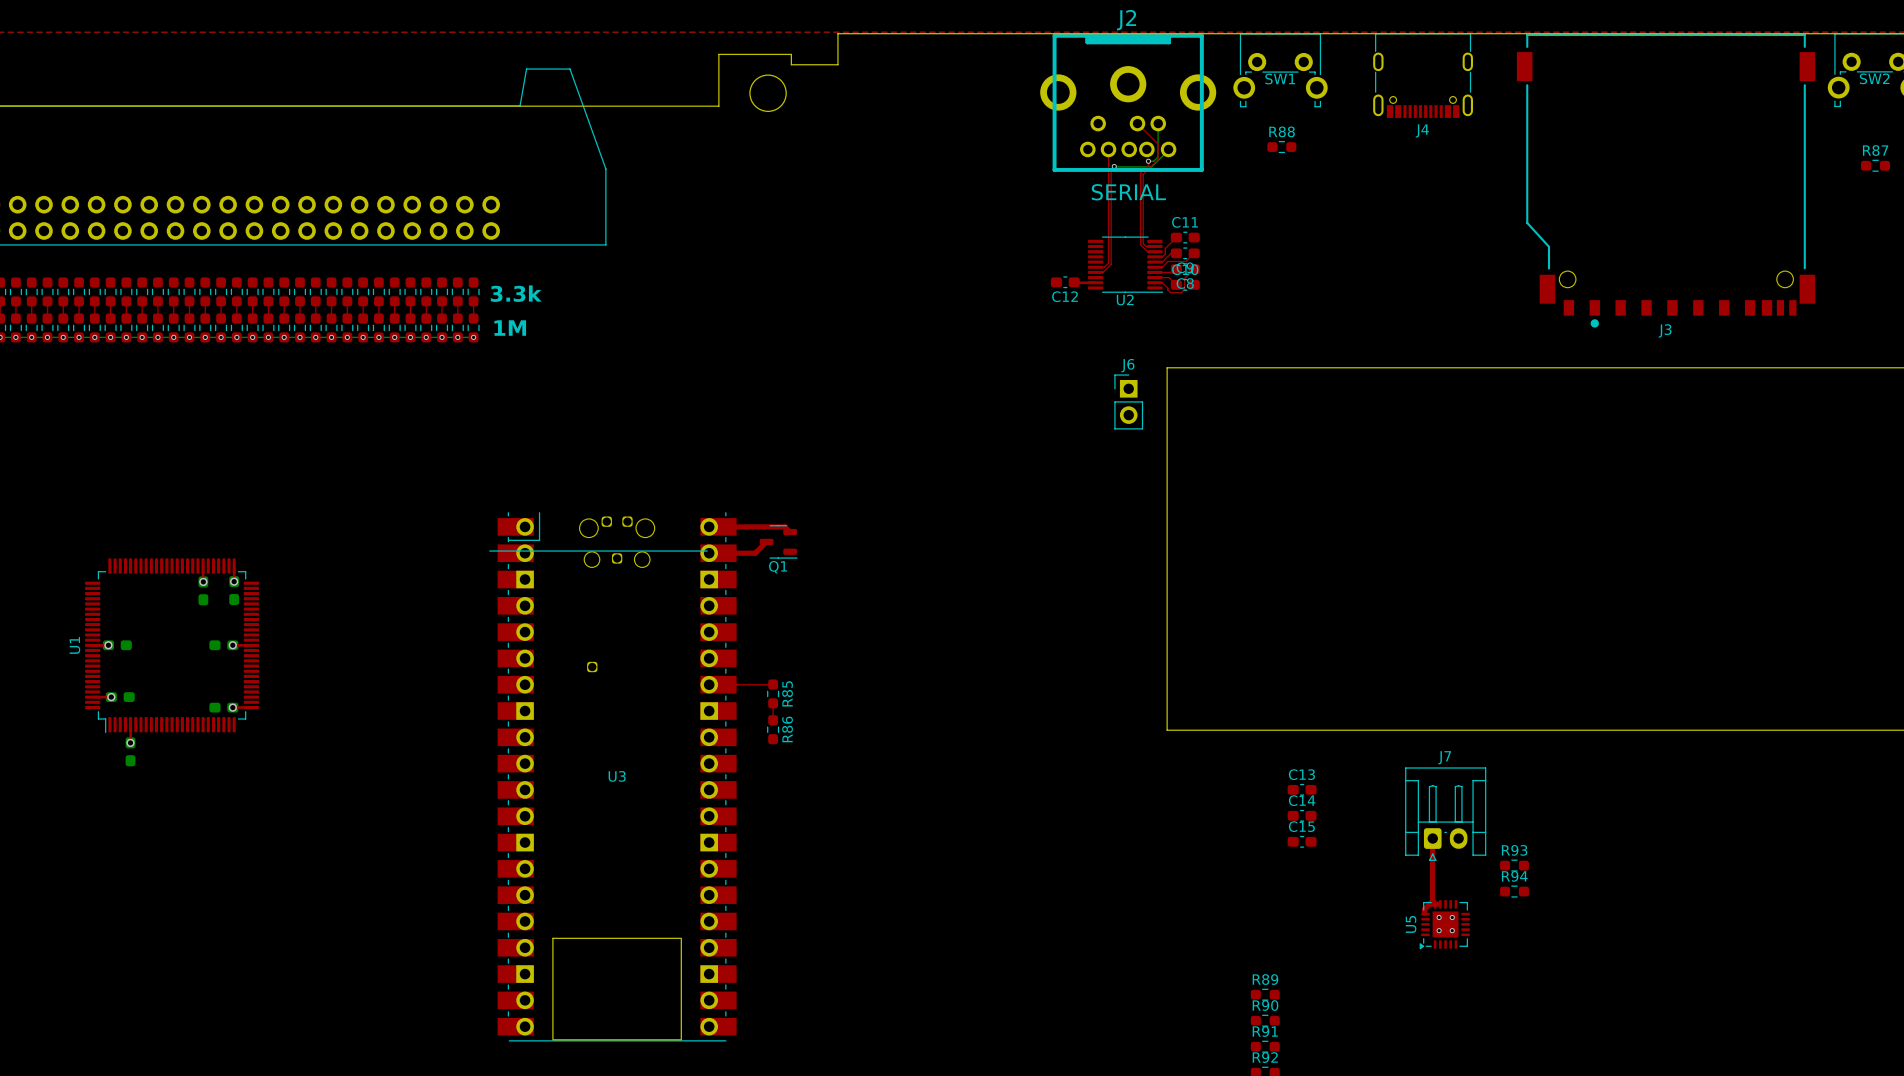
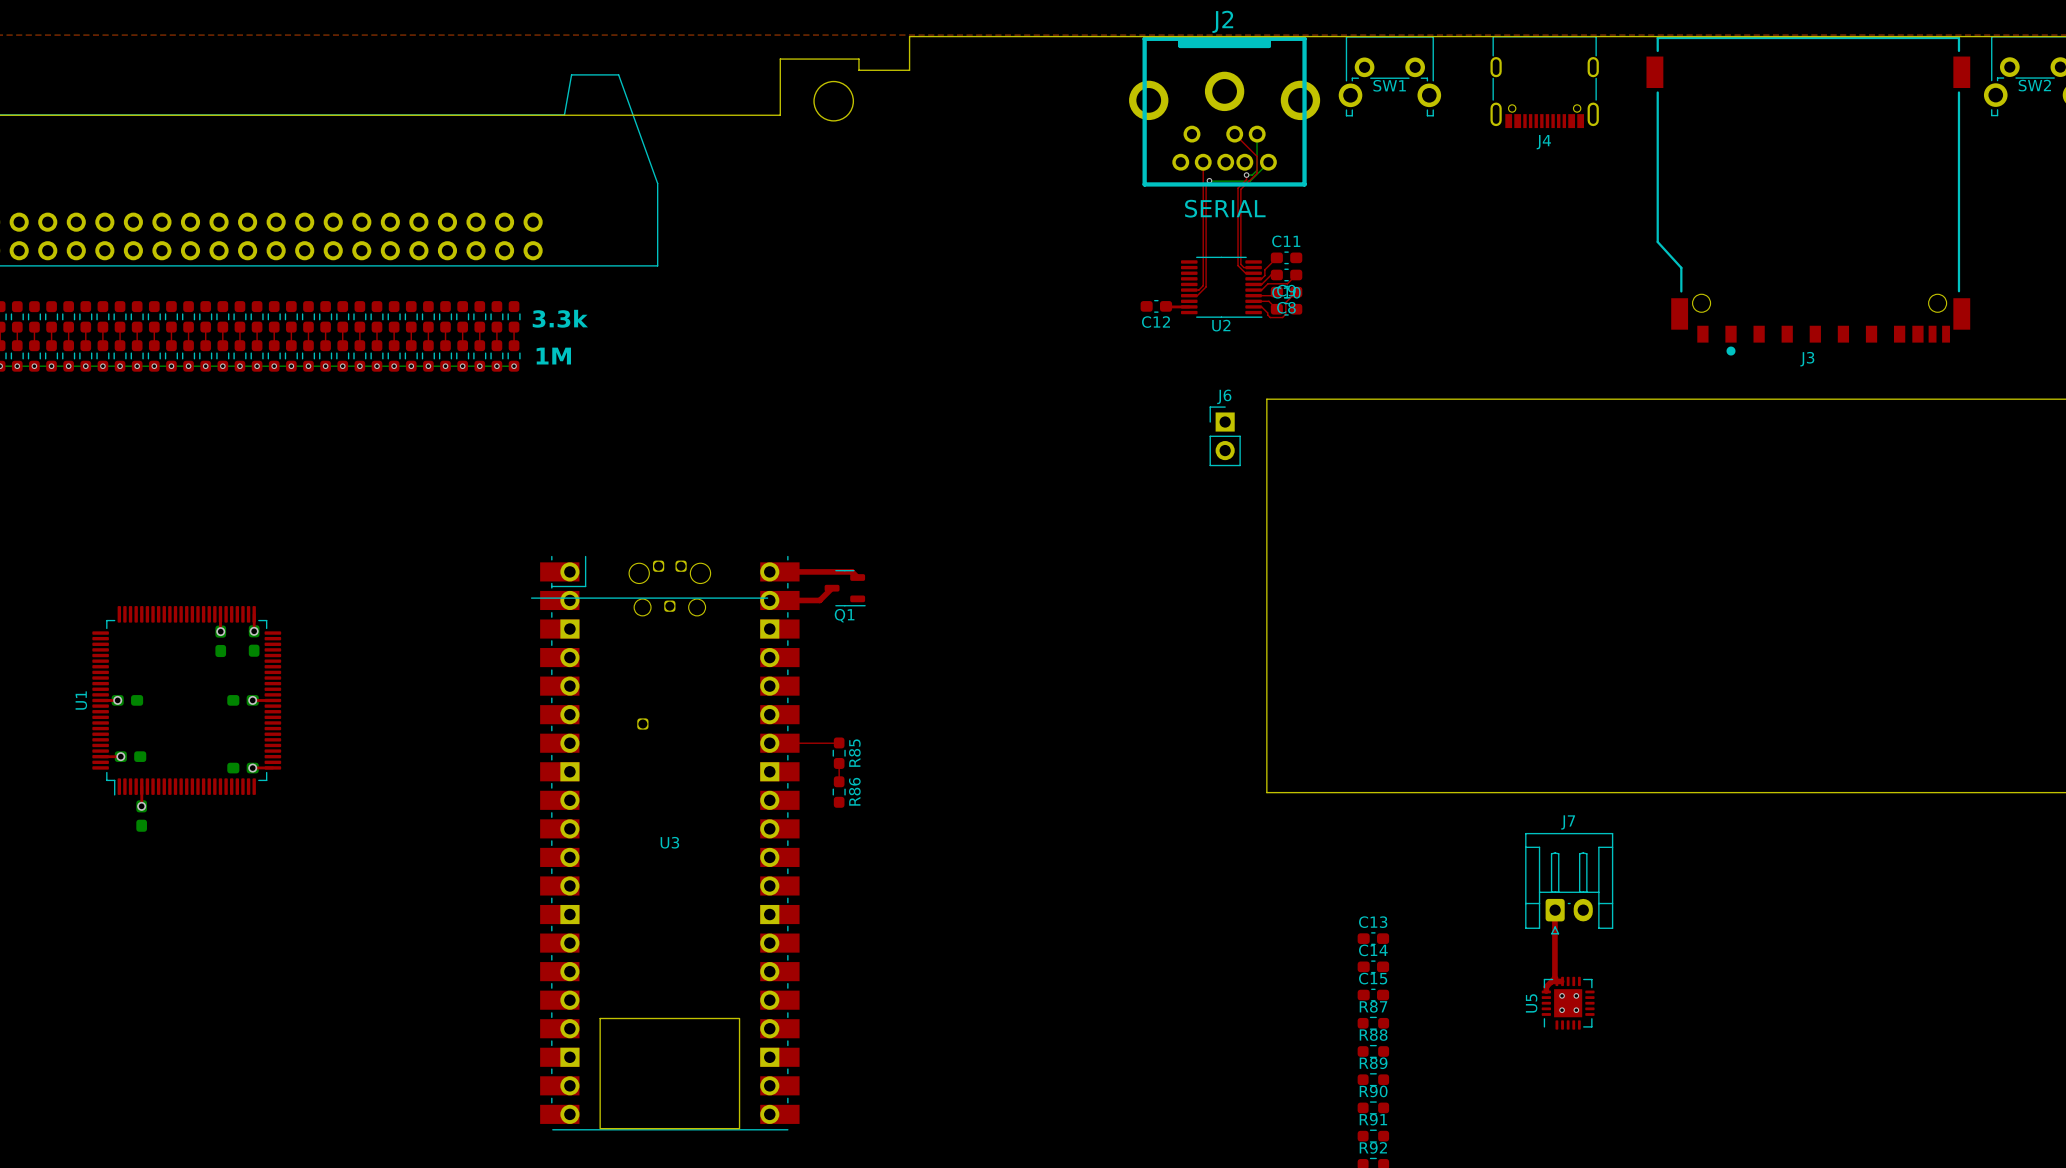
R88 position: (1281, 147) -> (1373, 1051)
R87 position: (1875, 165) -> (1373, 1023)
C13 position: (1302, 789) -> (1373, 938)
C14 position: (1302, 815) -> (1373, 966)
C15 position: (1302, 841) -> (1373, 995)
R93: (1514, 865) -> none
R94: (1514, 891) -> none
U5 footprint: [1419, 900, 1470, 950] -> [1541, 976, 1595, 1030]

